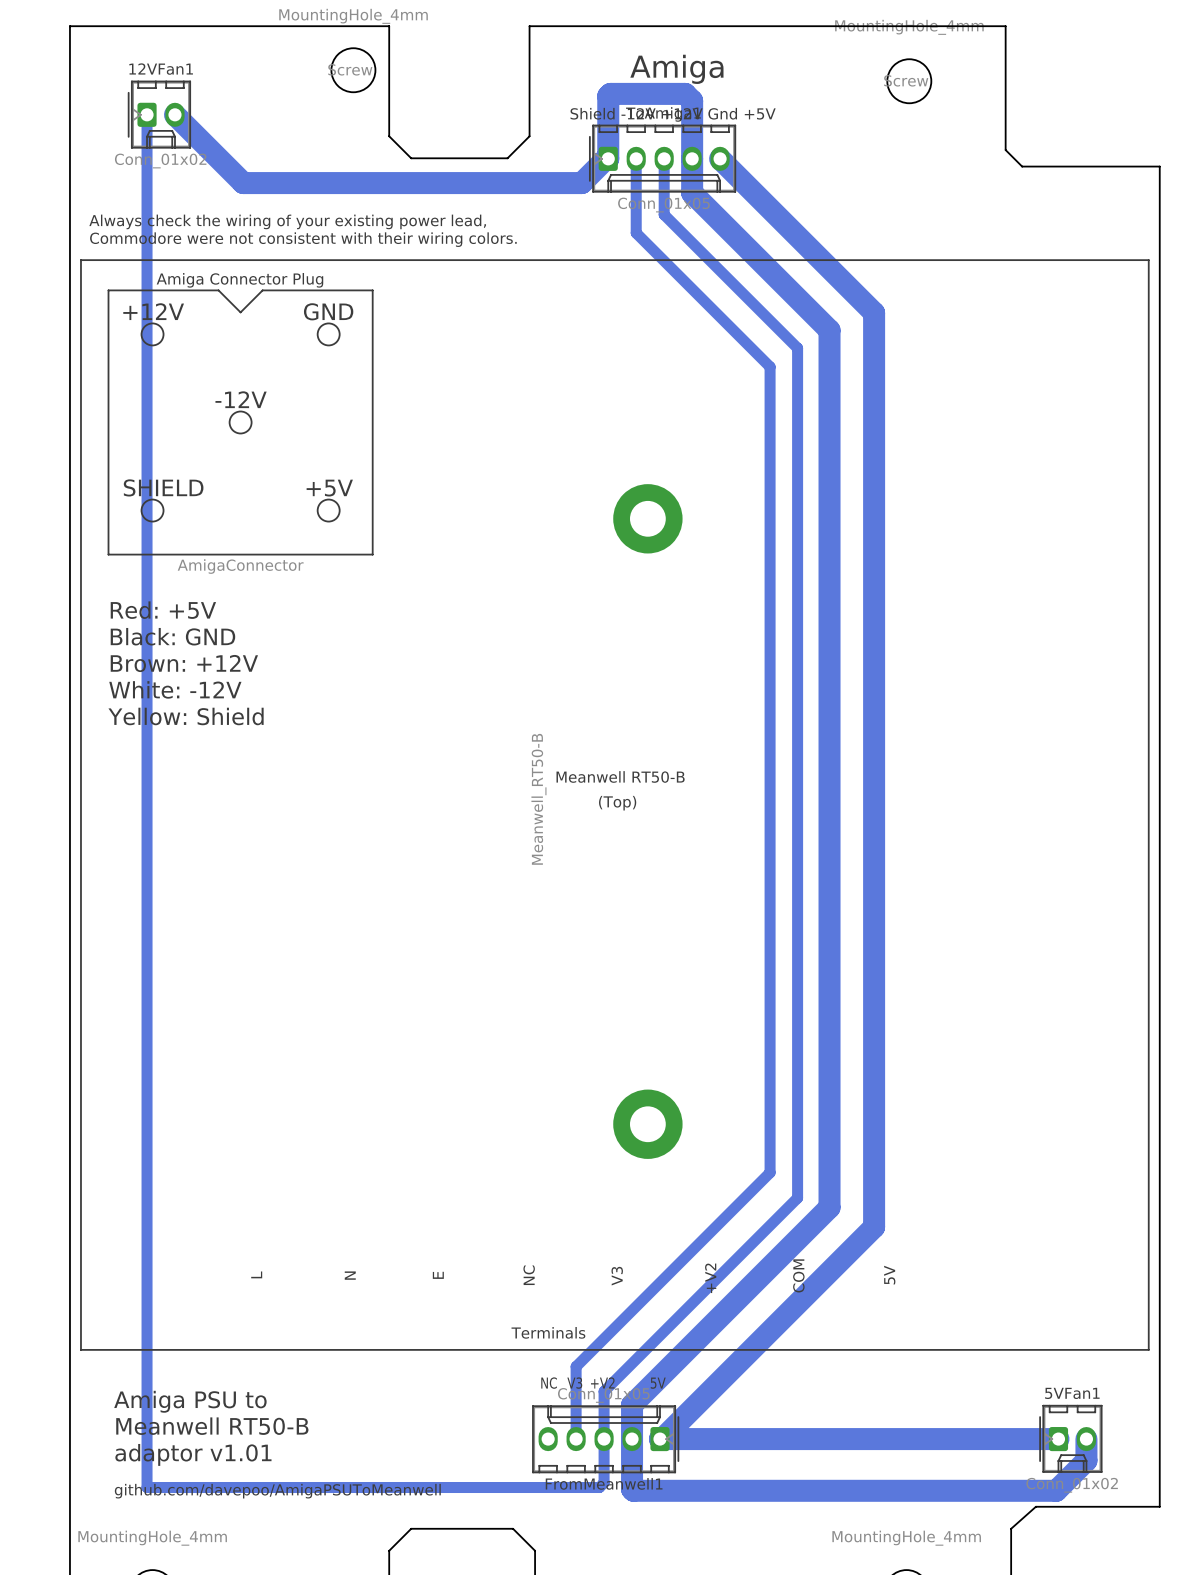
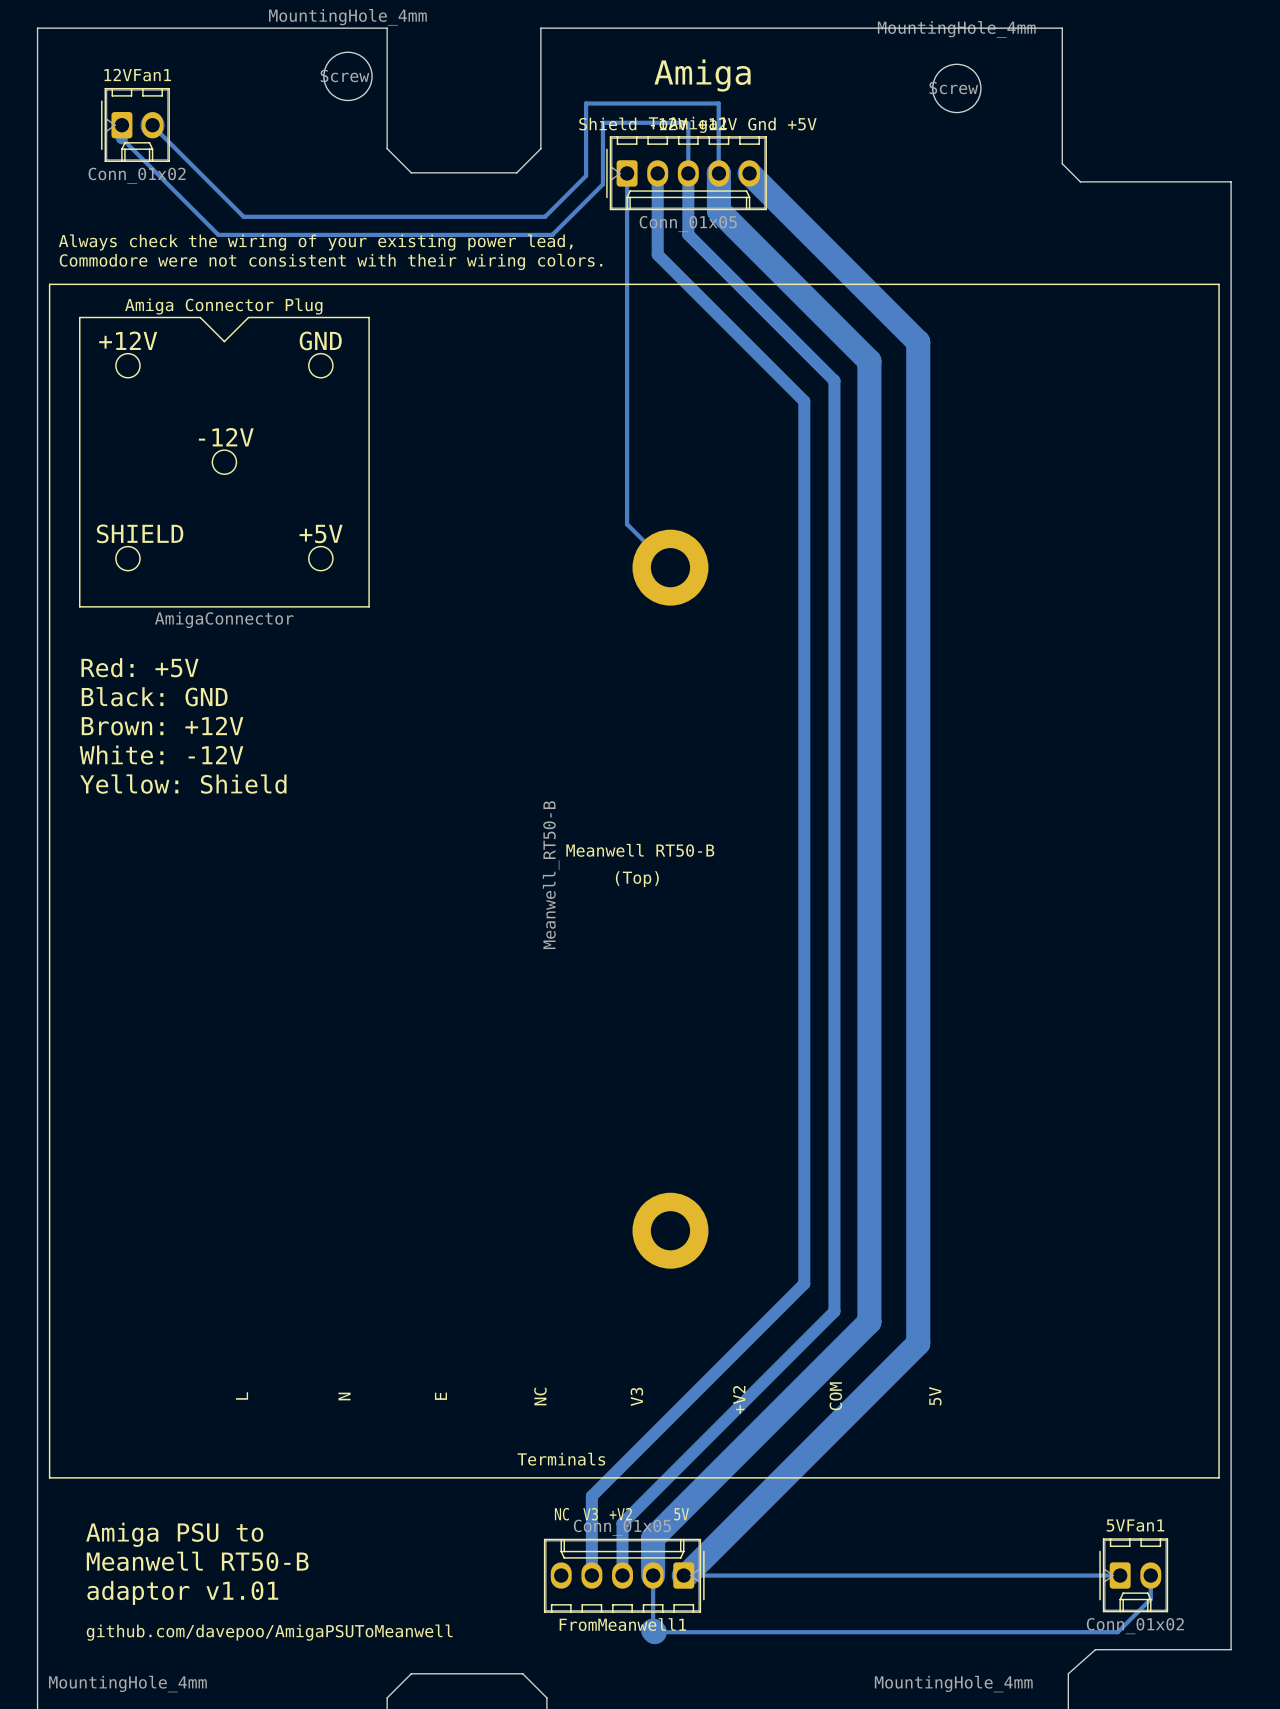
bottom track: none -> (688, 123) (688, 173)
bottom track: (174, 114) (243, 183) (581, 183) (608, 158) (608, 96) (610, 93) (685, 93) (692, 100) (692, 158) -> (152, 125) (243, 216) (545, 216) (586, 175) (586, 103) (718, 103) (718, 173)
bottom track: (147, 126) (147, 1487) (599, 1487) (604, 1482) (604, 1439) -> (121, 138) (218, 234) (552, 234) (602, 184) (602, 122) (687, 122)
bottom track: none -> (627, 173) (627, 524) (670, 567)
bottom track width: thick (632, 1439) (632, 1489) -> thin (653, 1575) (653, 1630)
bottom track width: thick (662, 1439) (1058, 1439) -> thin (686, 1575) (1120, 1575)
bottom track width: thick (1086, 1439) (1086, 1460) (1056, 1490) (633, 1490) -> thin (1150, 1575) (1150, 1599) (1117, 1632) (654, 1632)

